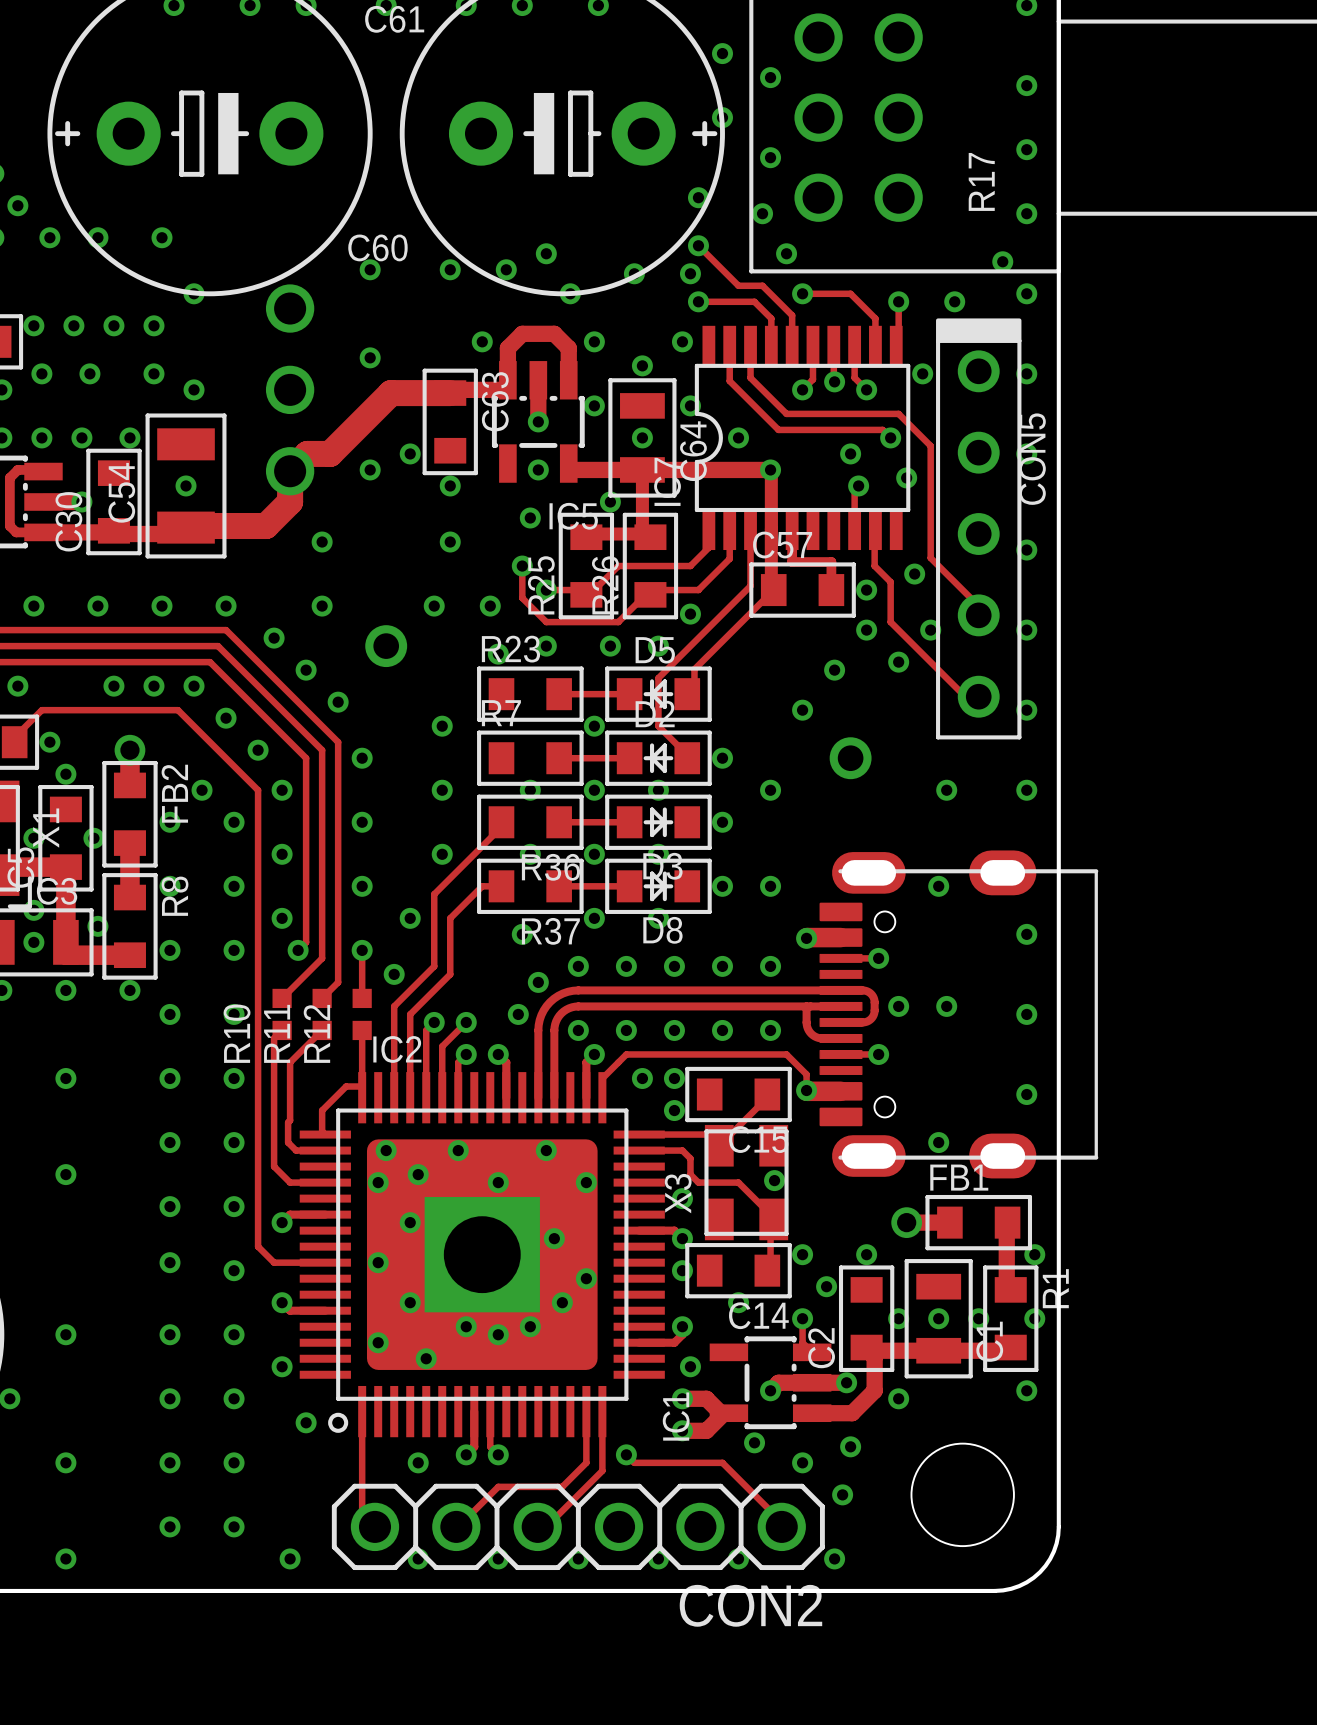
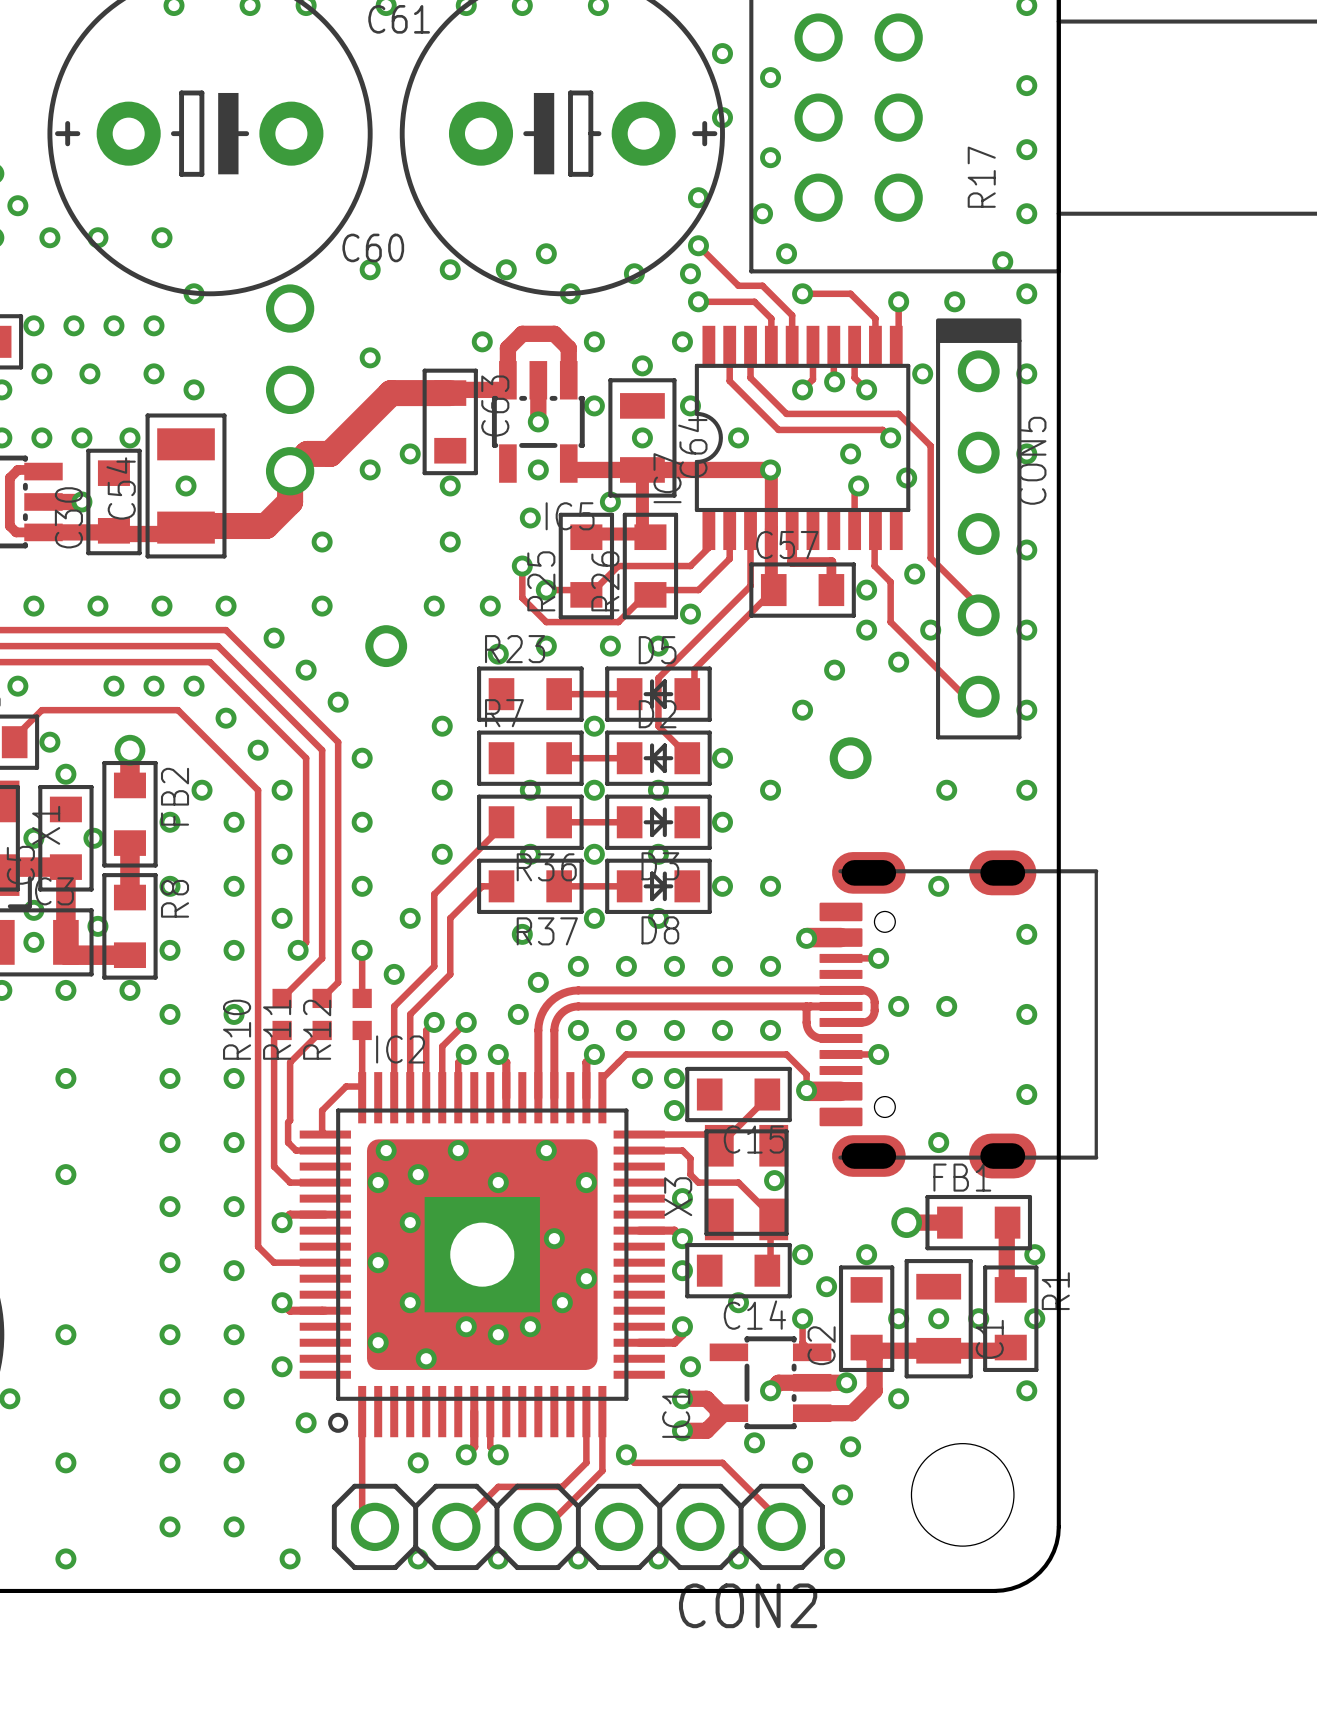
IC2 footprint: [299, 1072, 665, 1438] -> [299, 1072, 665, 1438]

